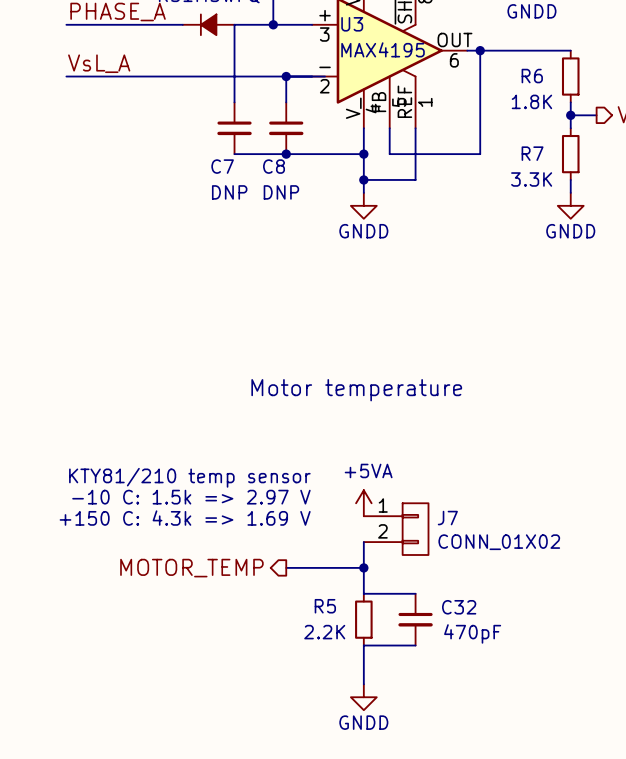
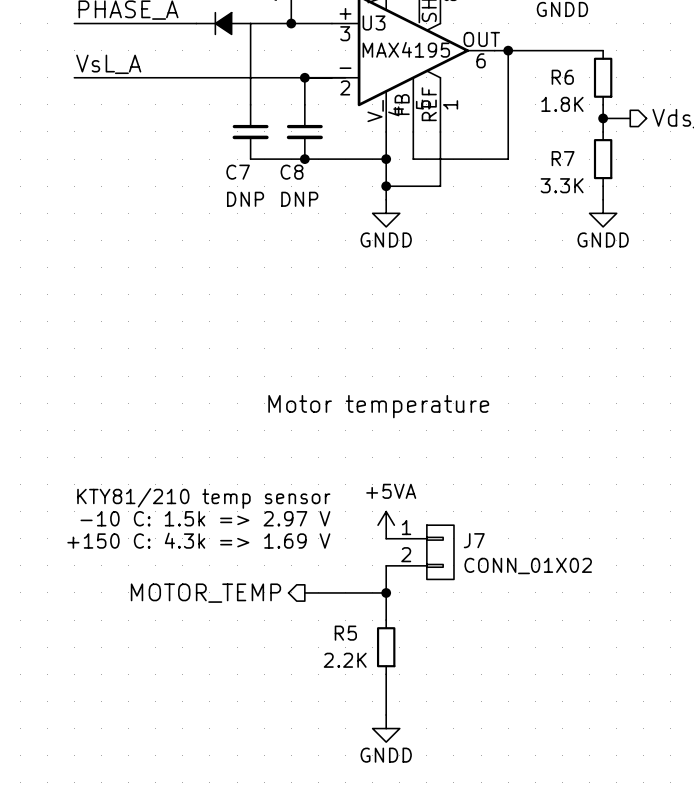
wire: (363, 593) (415, 593) -> none
C32: 470pF (415, 619) -> none
wire: (363, 645) (415, 645) -> none

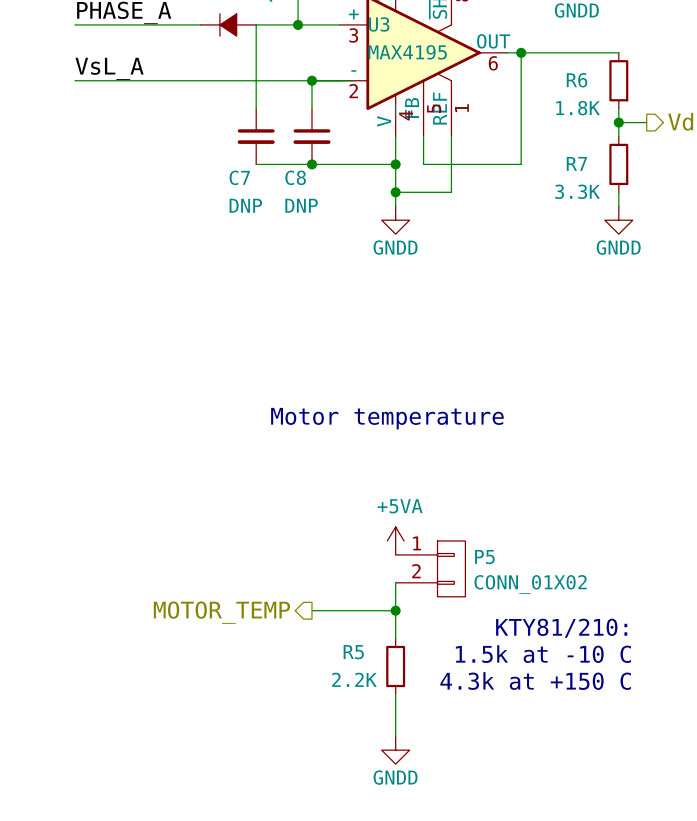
text: KTY81/210 temp sensor (203, 498) -> none
text: -10 C: 1.5k => 2.97 V (205, 518) -> none
text: +150 C: 4.3k => 1.69 V (198, 540) -> none
J7 name: J7 (474, 540) -> P5 (484, 557)
text: none -> KTY81/210: (561, 628)
text: none -> 1.5k at -10 C (543, 654)
text: none -> 4.3k at +150 C (535, 681)

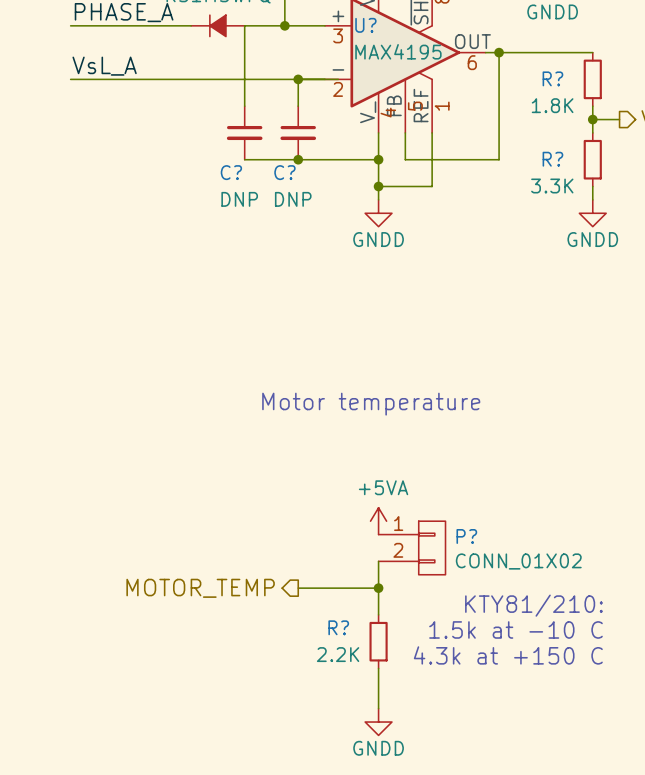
U3 name: U3 (379, 24) -> U? (365, 25)
R6 name: R6 (577, 80) -> R? (552, 78)
R7 name: R7 (576, 163) -> R? (552, 159)
C7 name: C7 (239, 177) -> C? (231, 172)
C8 name: C8 (295, 177) -> C? (284, 172)
P5 name: P5 (484, 557) -> P? (466, 536)
R5 name: R5 (353, 652) -> R? (338, 627)

